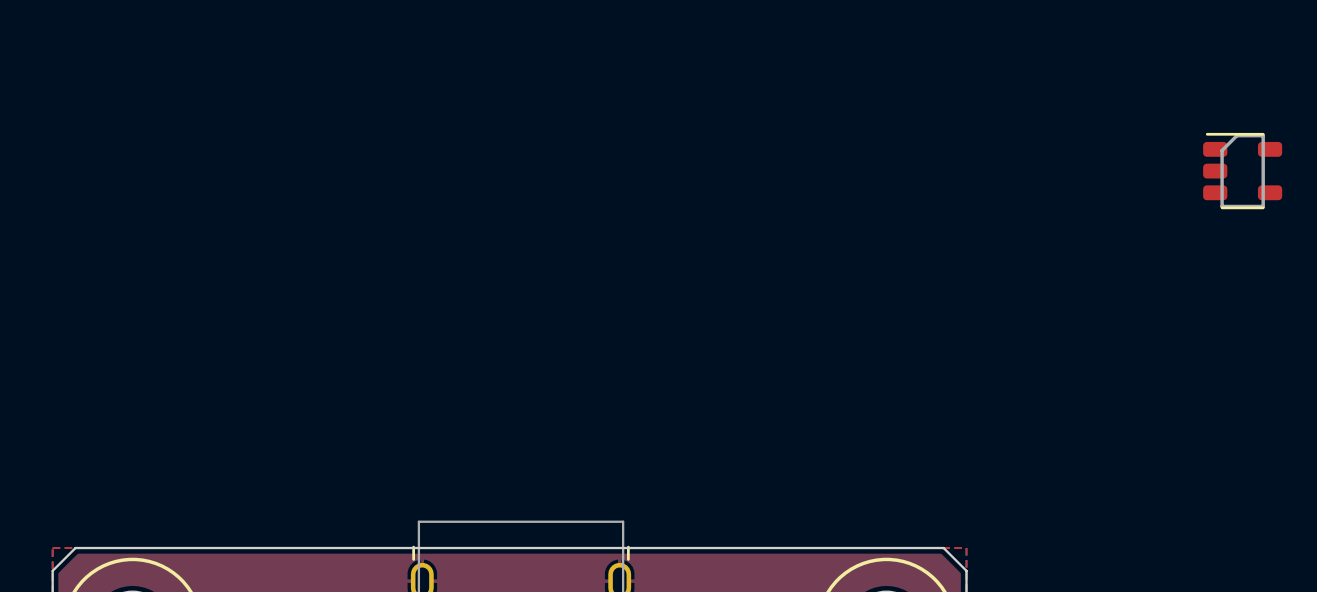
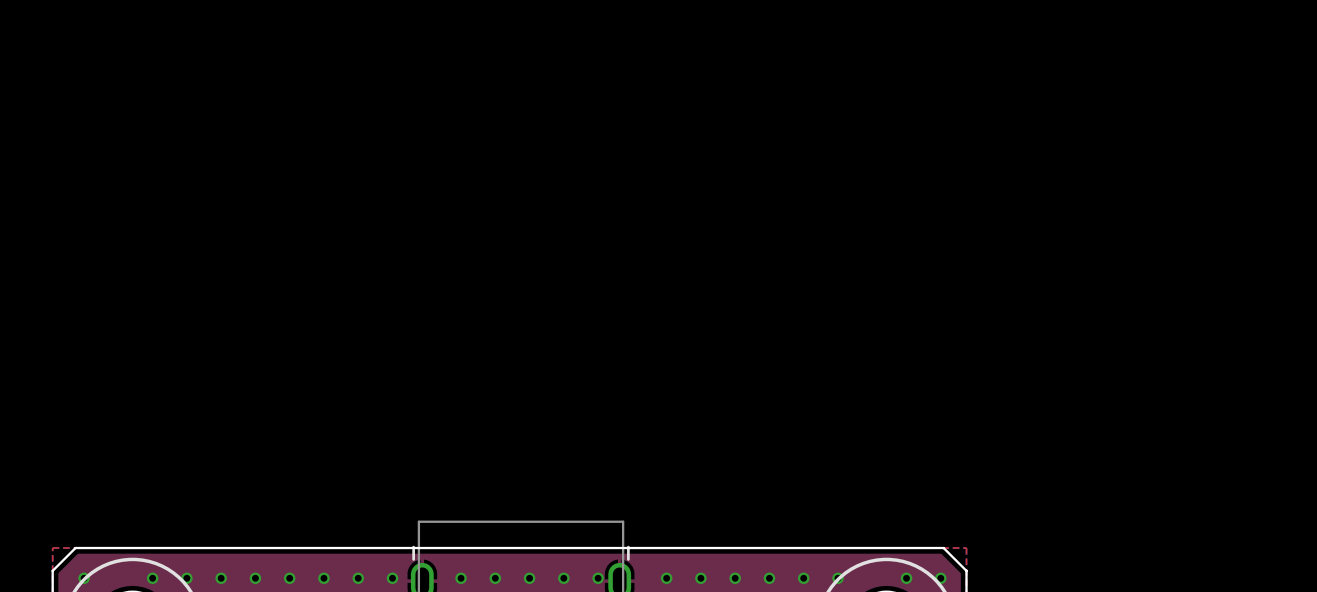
part: (1242, 171) -> none
via: none -> (84, 578)
via: none -> (152, 578)
via: none -> (186, 578)
via: none -> (221, 578)
via: none -> (255, 578)
via: none -> (289, 578)
via: none -> (323, 578)
via: none -> (358, 578)
via: none -> (392, 578)
via: none -> (461, 578)
via: none -> (495, 578)
via: none -> (529, 578)
via: none -> (563, 578)
via: none -> (598, 578)
via: none -> (666, 578)
via: none -> (700, 578)
via: none -> (735, 578)
via: none -> (769, 578)
via: none -> (803, 578)
via: none -> (837, 578)
via: none -> (906, 578)
via: none -> (940, 578)

